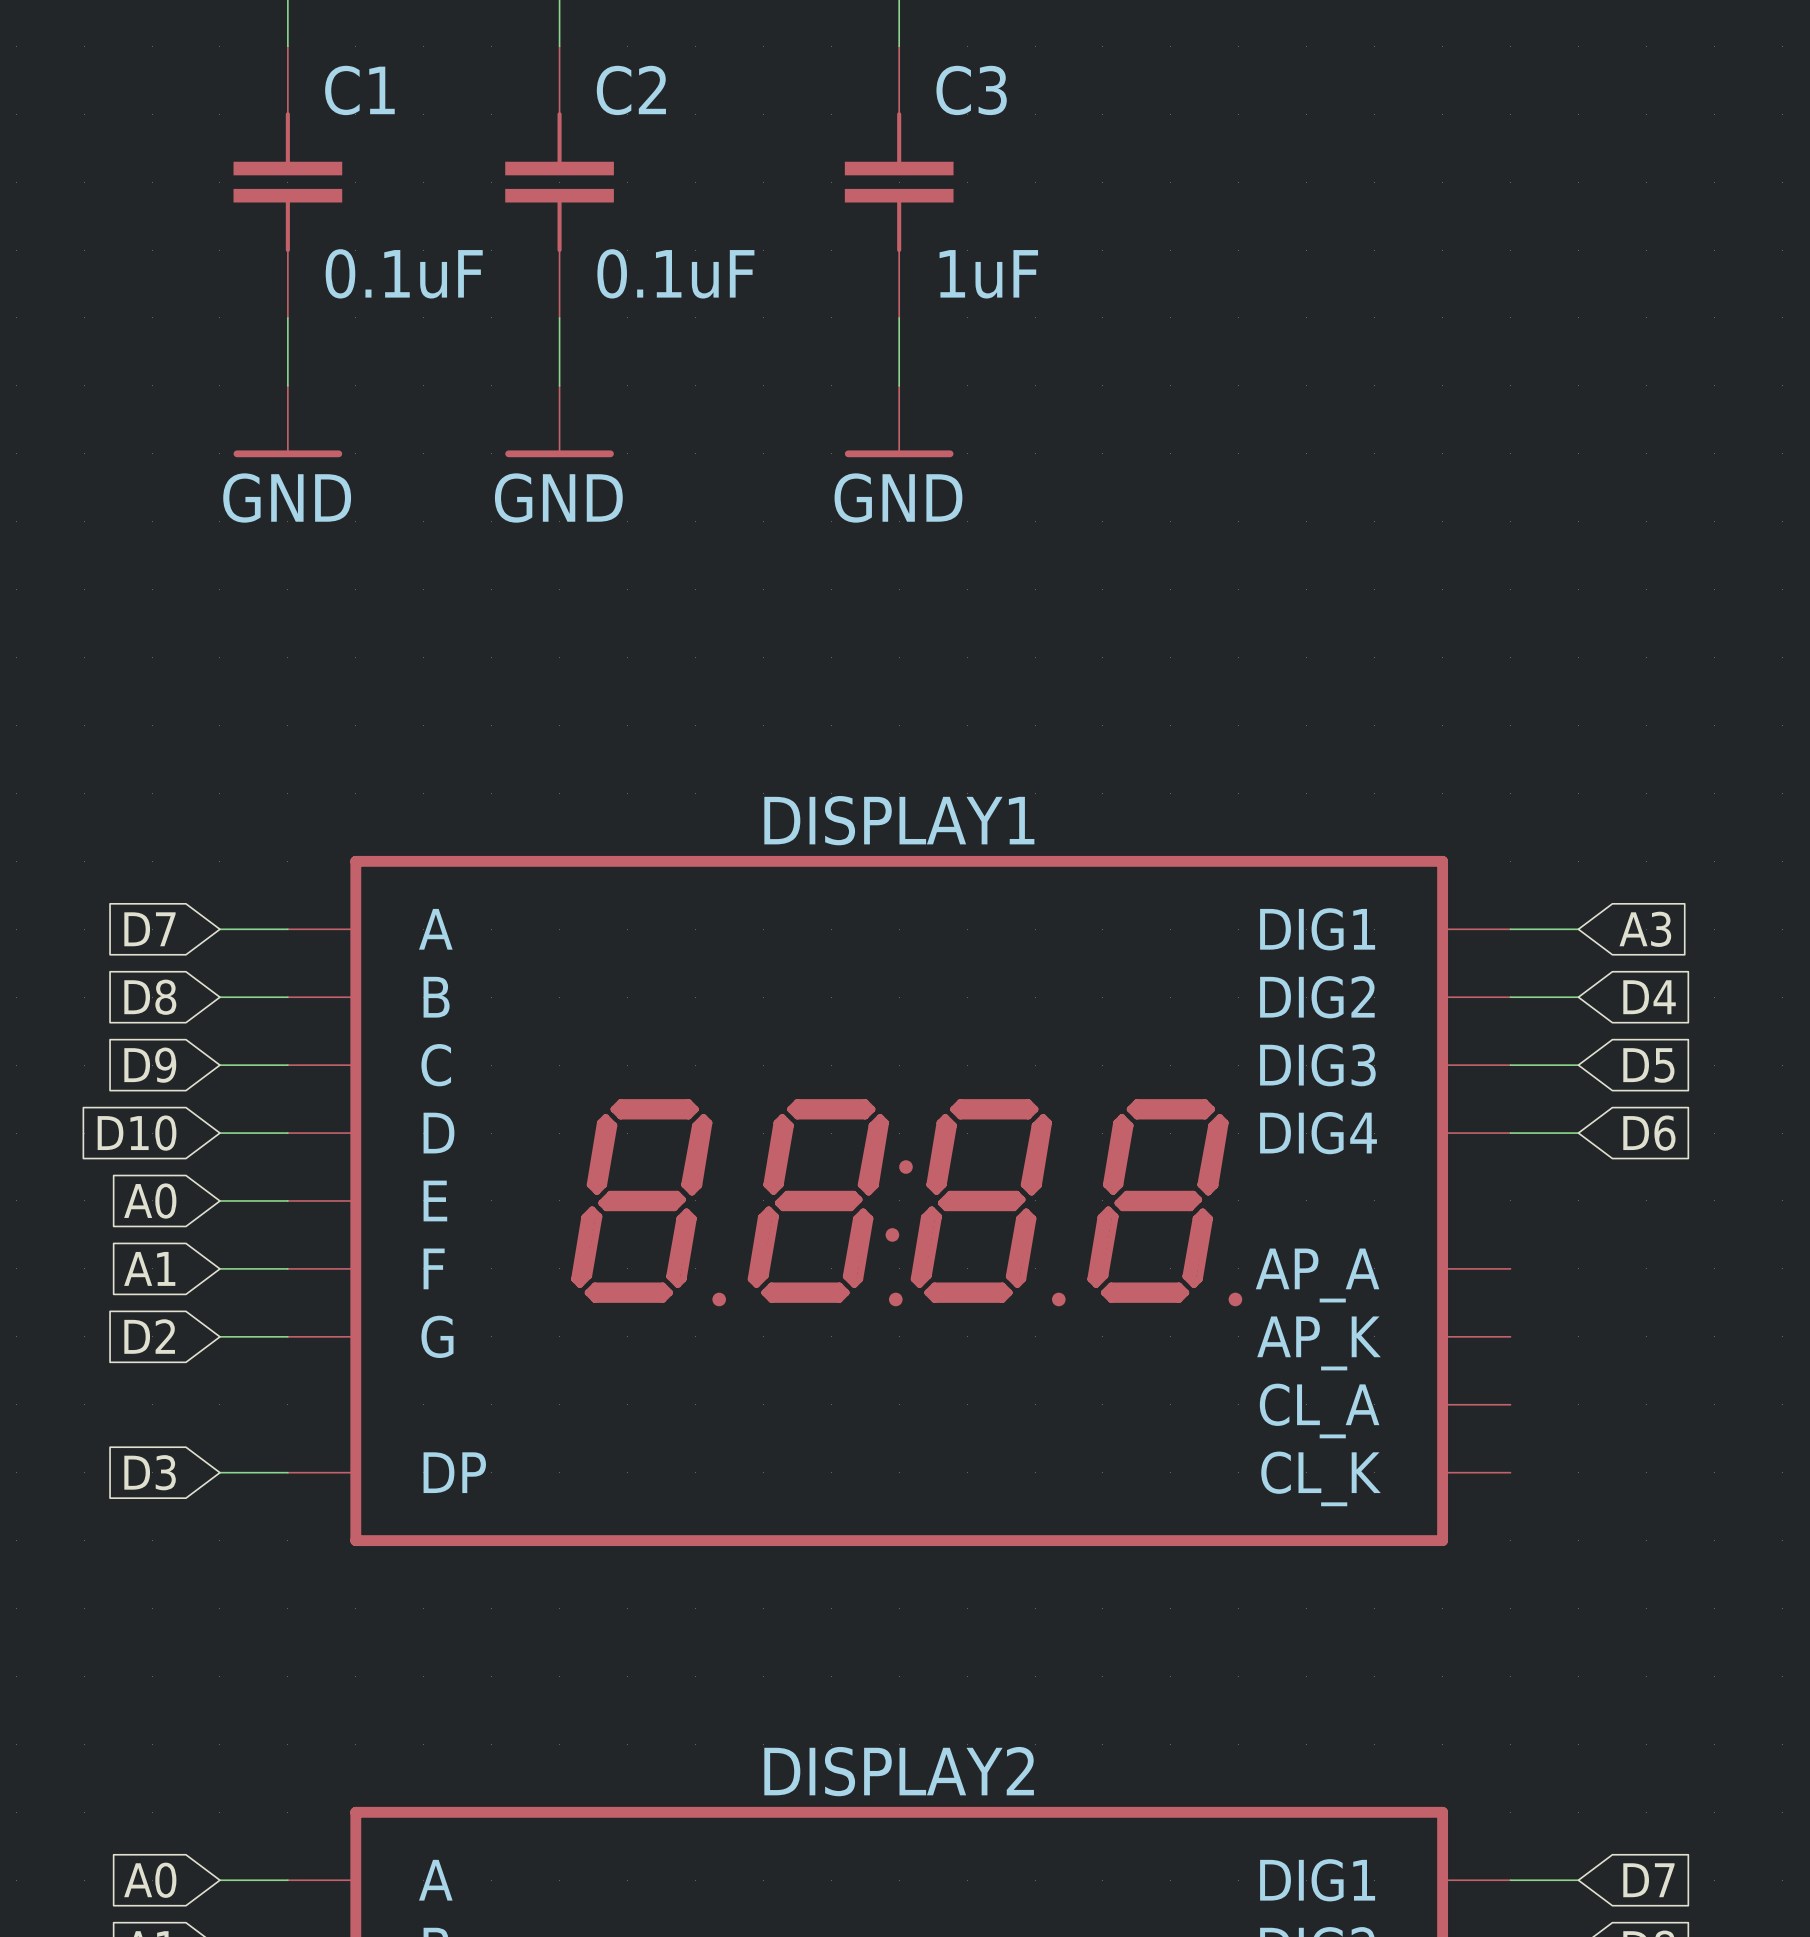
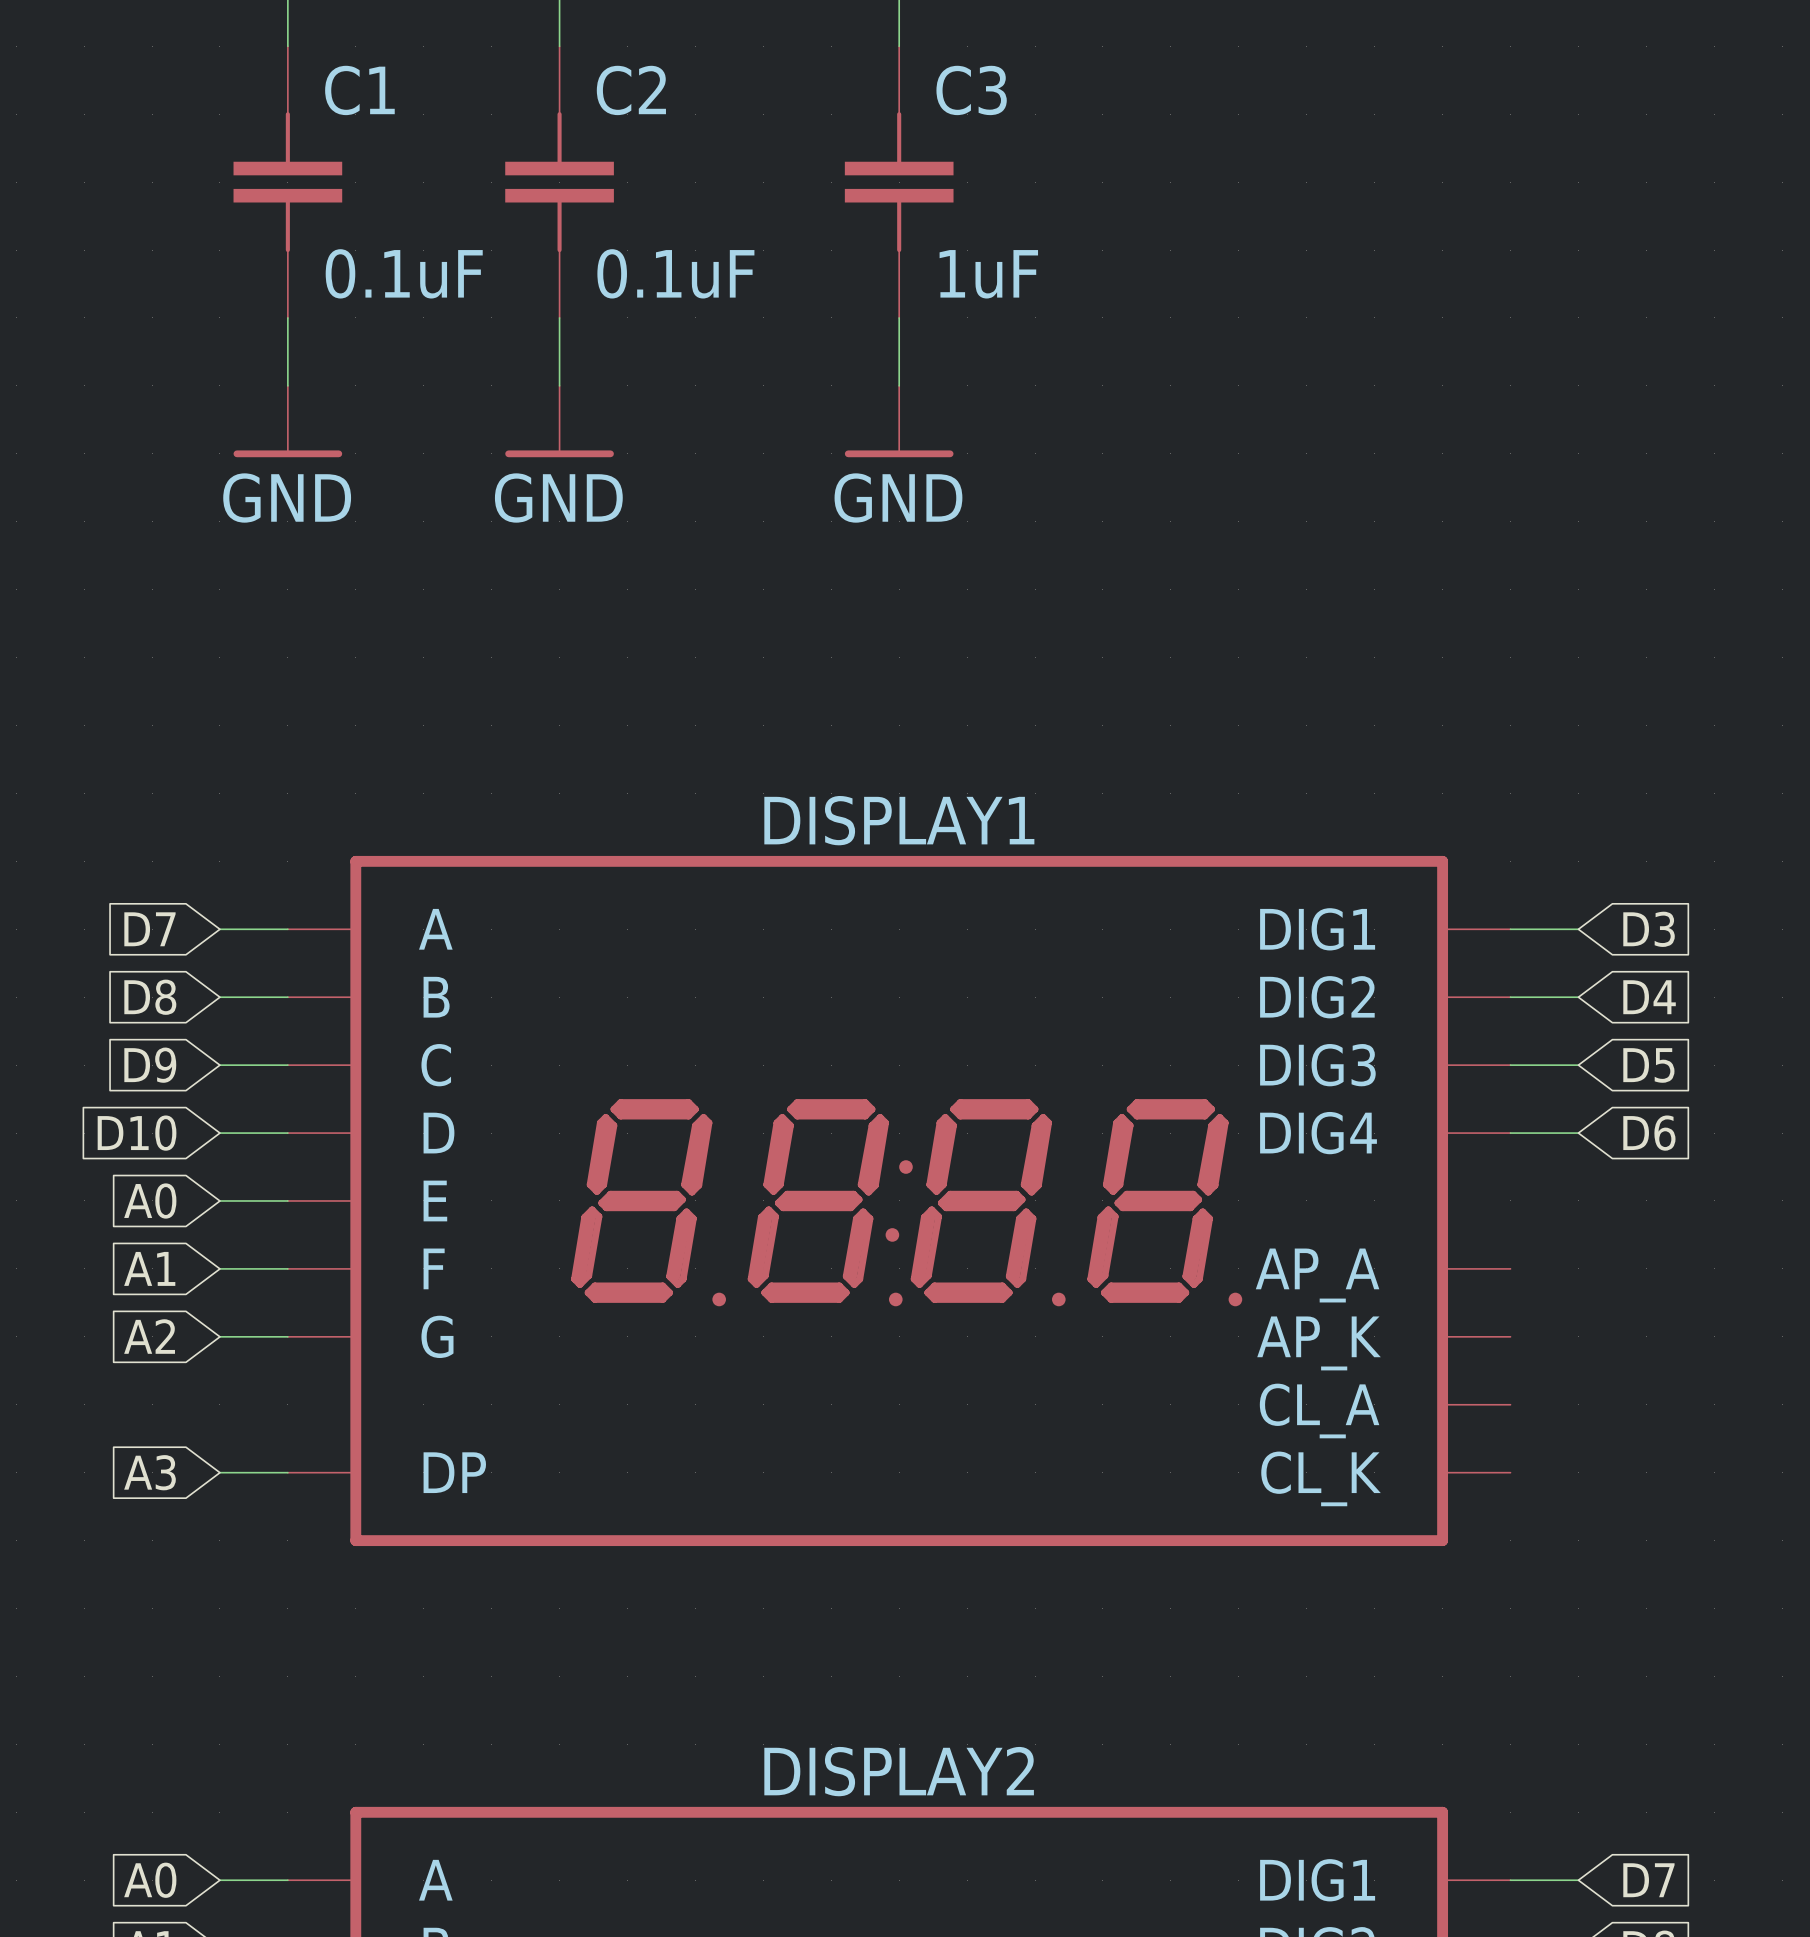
global label: A3 (1645, 929) -> D3 (1649, 929)
global label: D2 (149, 1336) -> A2 (149, 1336)
global label: D3 (150, 1472) -> A3 (149, 1472)

